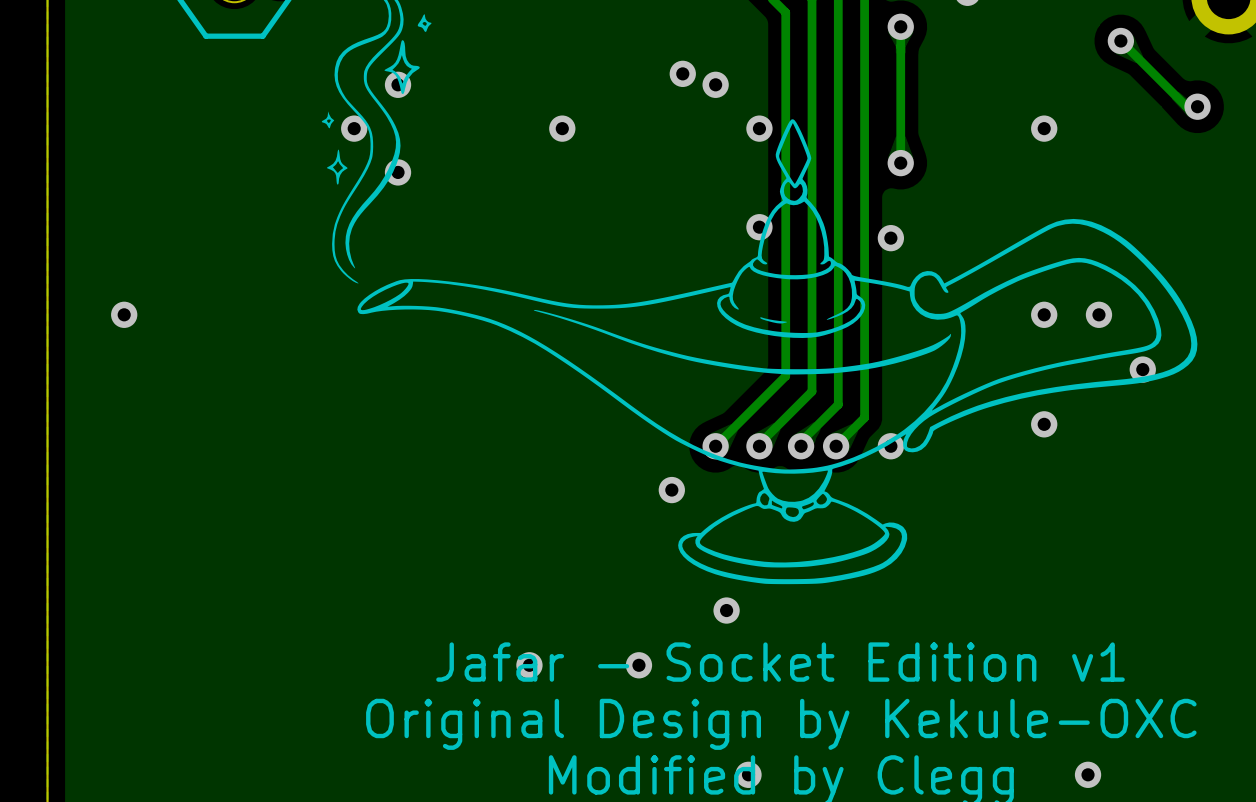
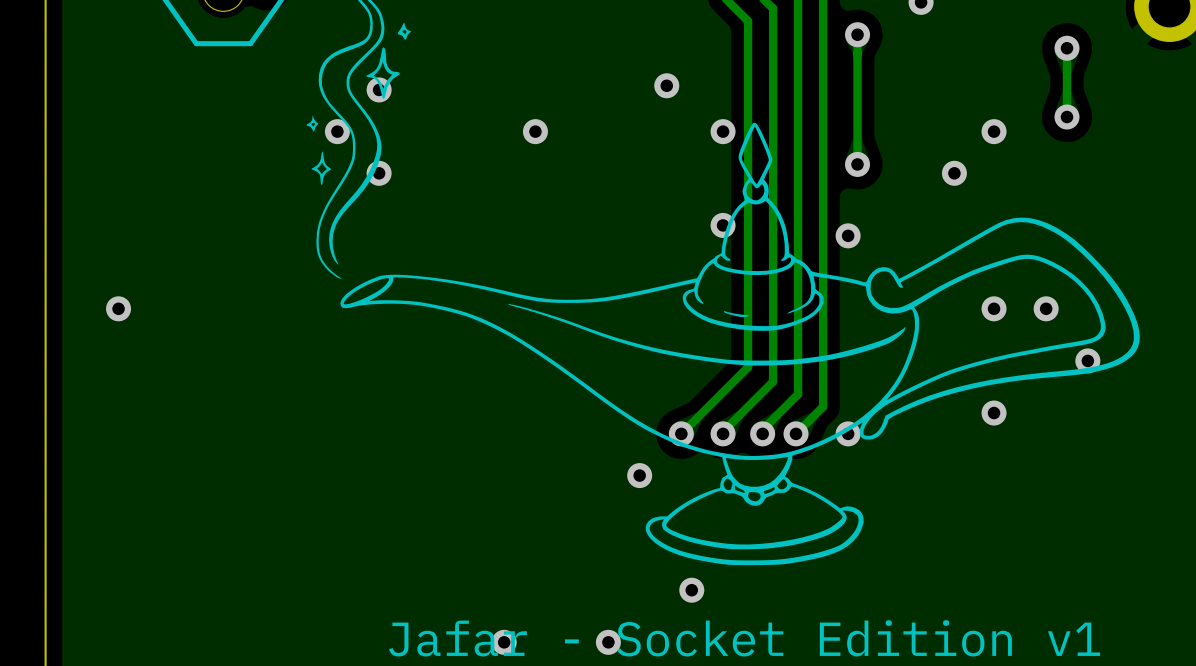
track: (1120, 41) (1186, 106) (1197, 106) -> (1066, 48) (1066, 117)
via: (682, 73) -> none
via: none -> (666, 85)
via: (715, 84) -> none
via position: (1197, 106) -> (1066, 117)
via: none -> (954, 173)

